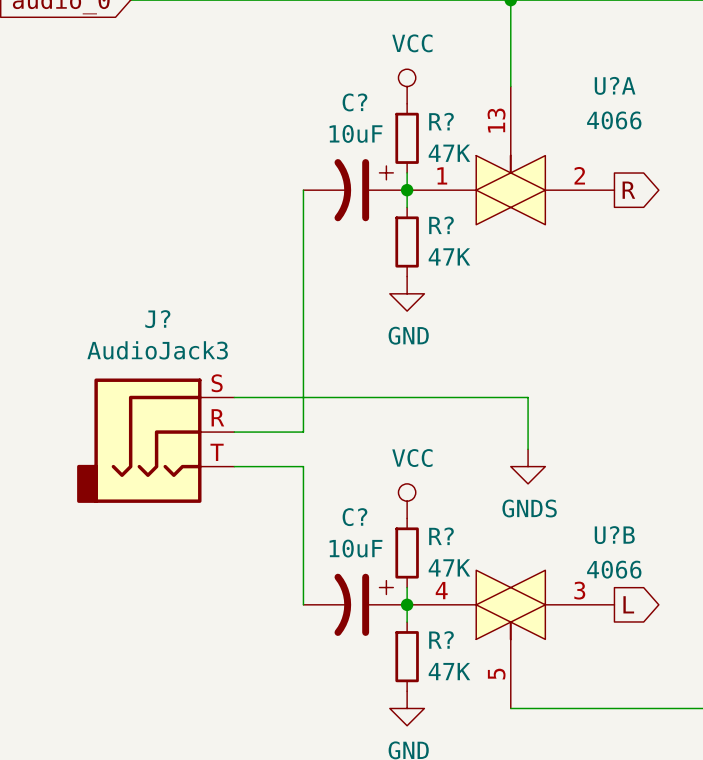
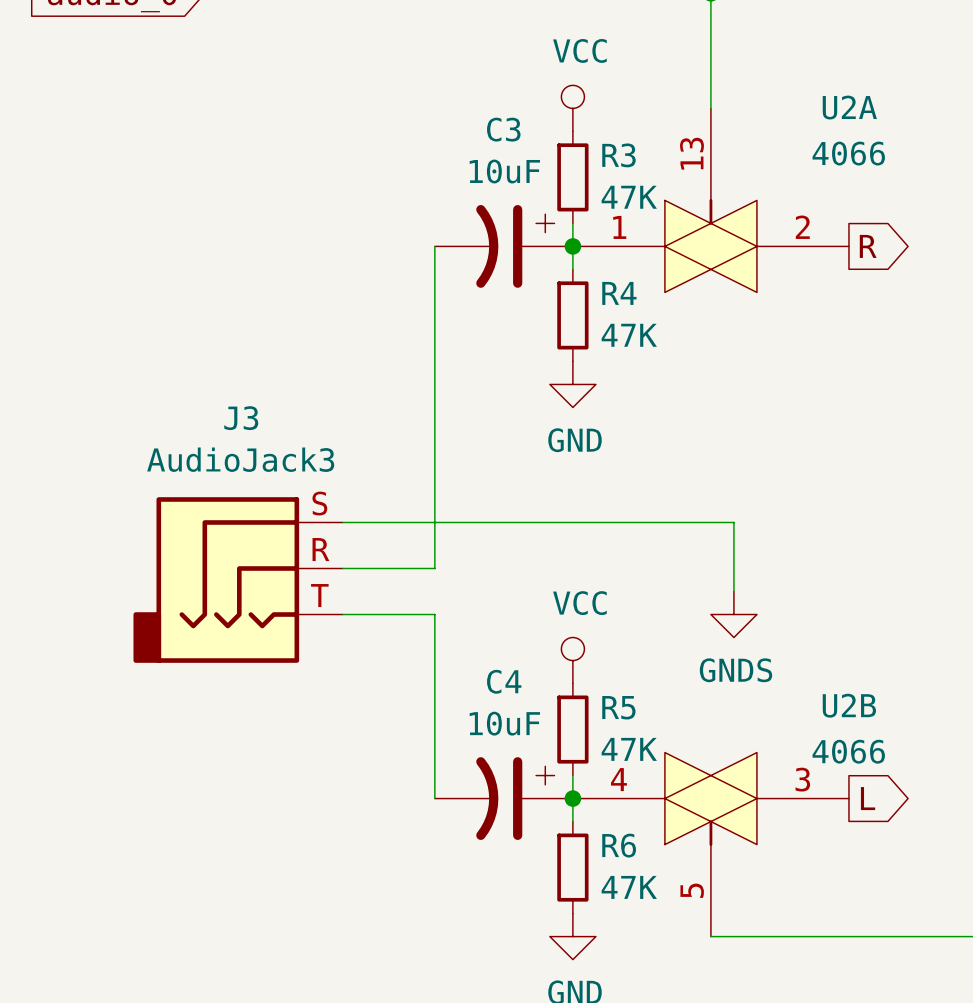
U?A name: U?A (615, 85) -> U2A (849, 107)
C? name: C? (354, 102) -> C3 (503, 129)
R? name: R? (441, 121) -> R3 (618, 155)
R? name: R? (441, 225) -> R4 (619, 293)
J? name: J? (157, 319) -> J3 (241, 418)
C? name: C? (354, 517) -> C4 (504, 681)
U?B name: U?B (614, 535) -> U2B (849, 705)
R? name: R? (441, 536) -> R5 (618, 707)
R? name: R? (441, 639) -> R6 (619, 845)

